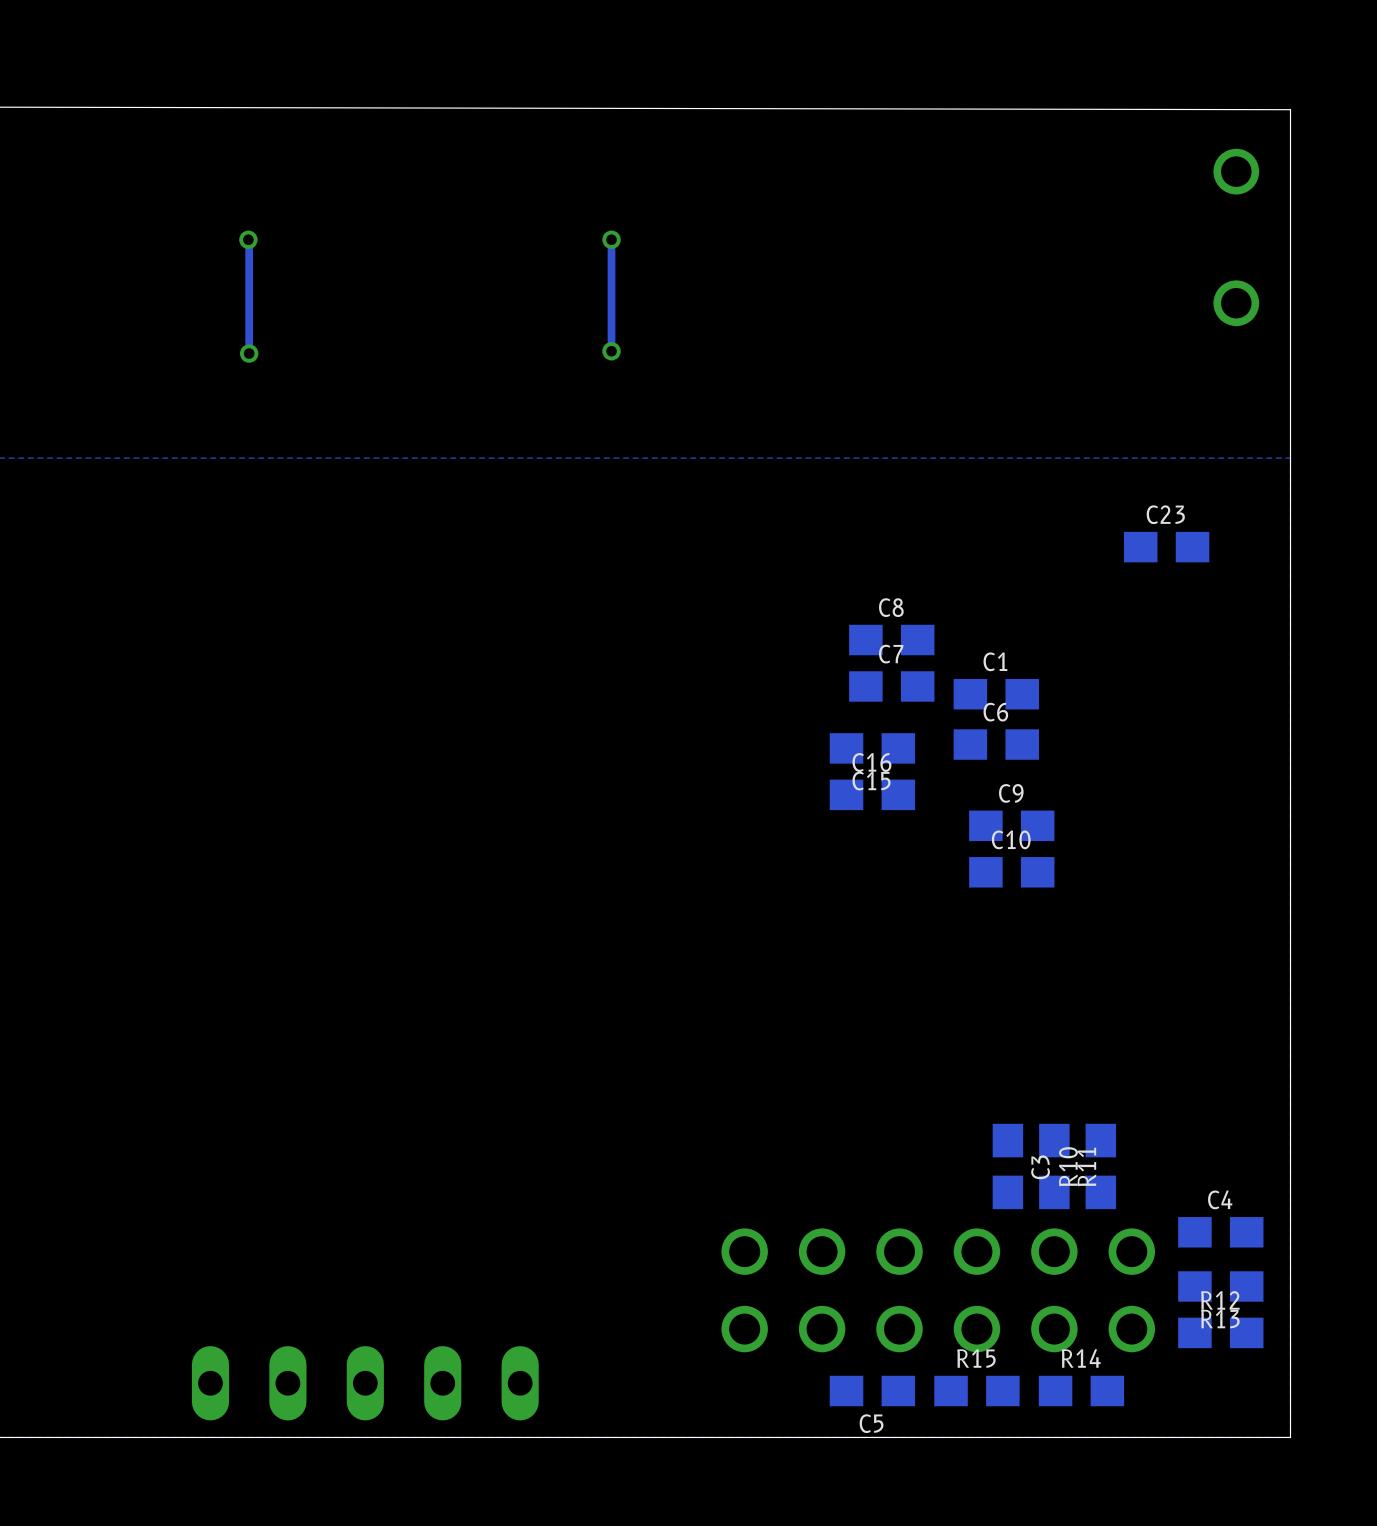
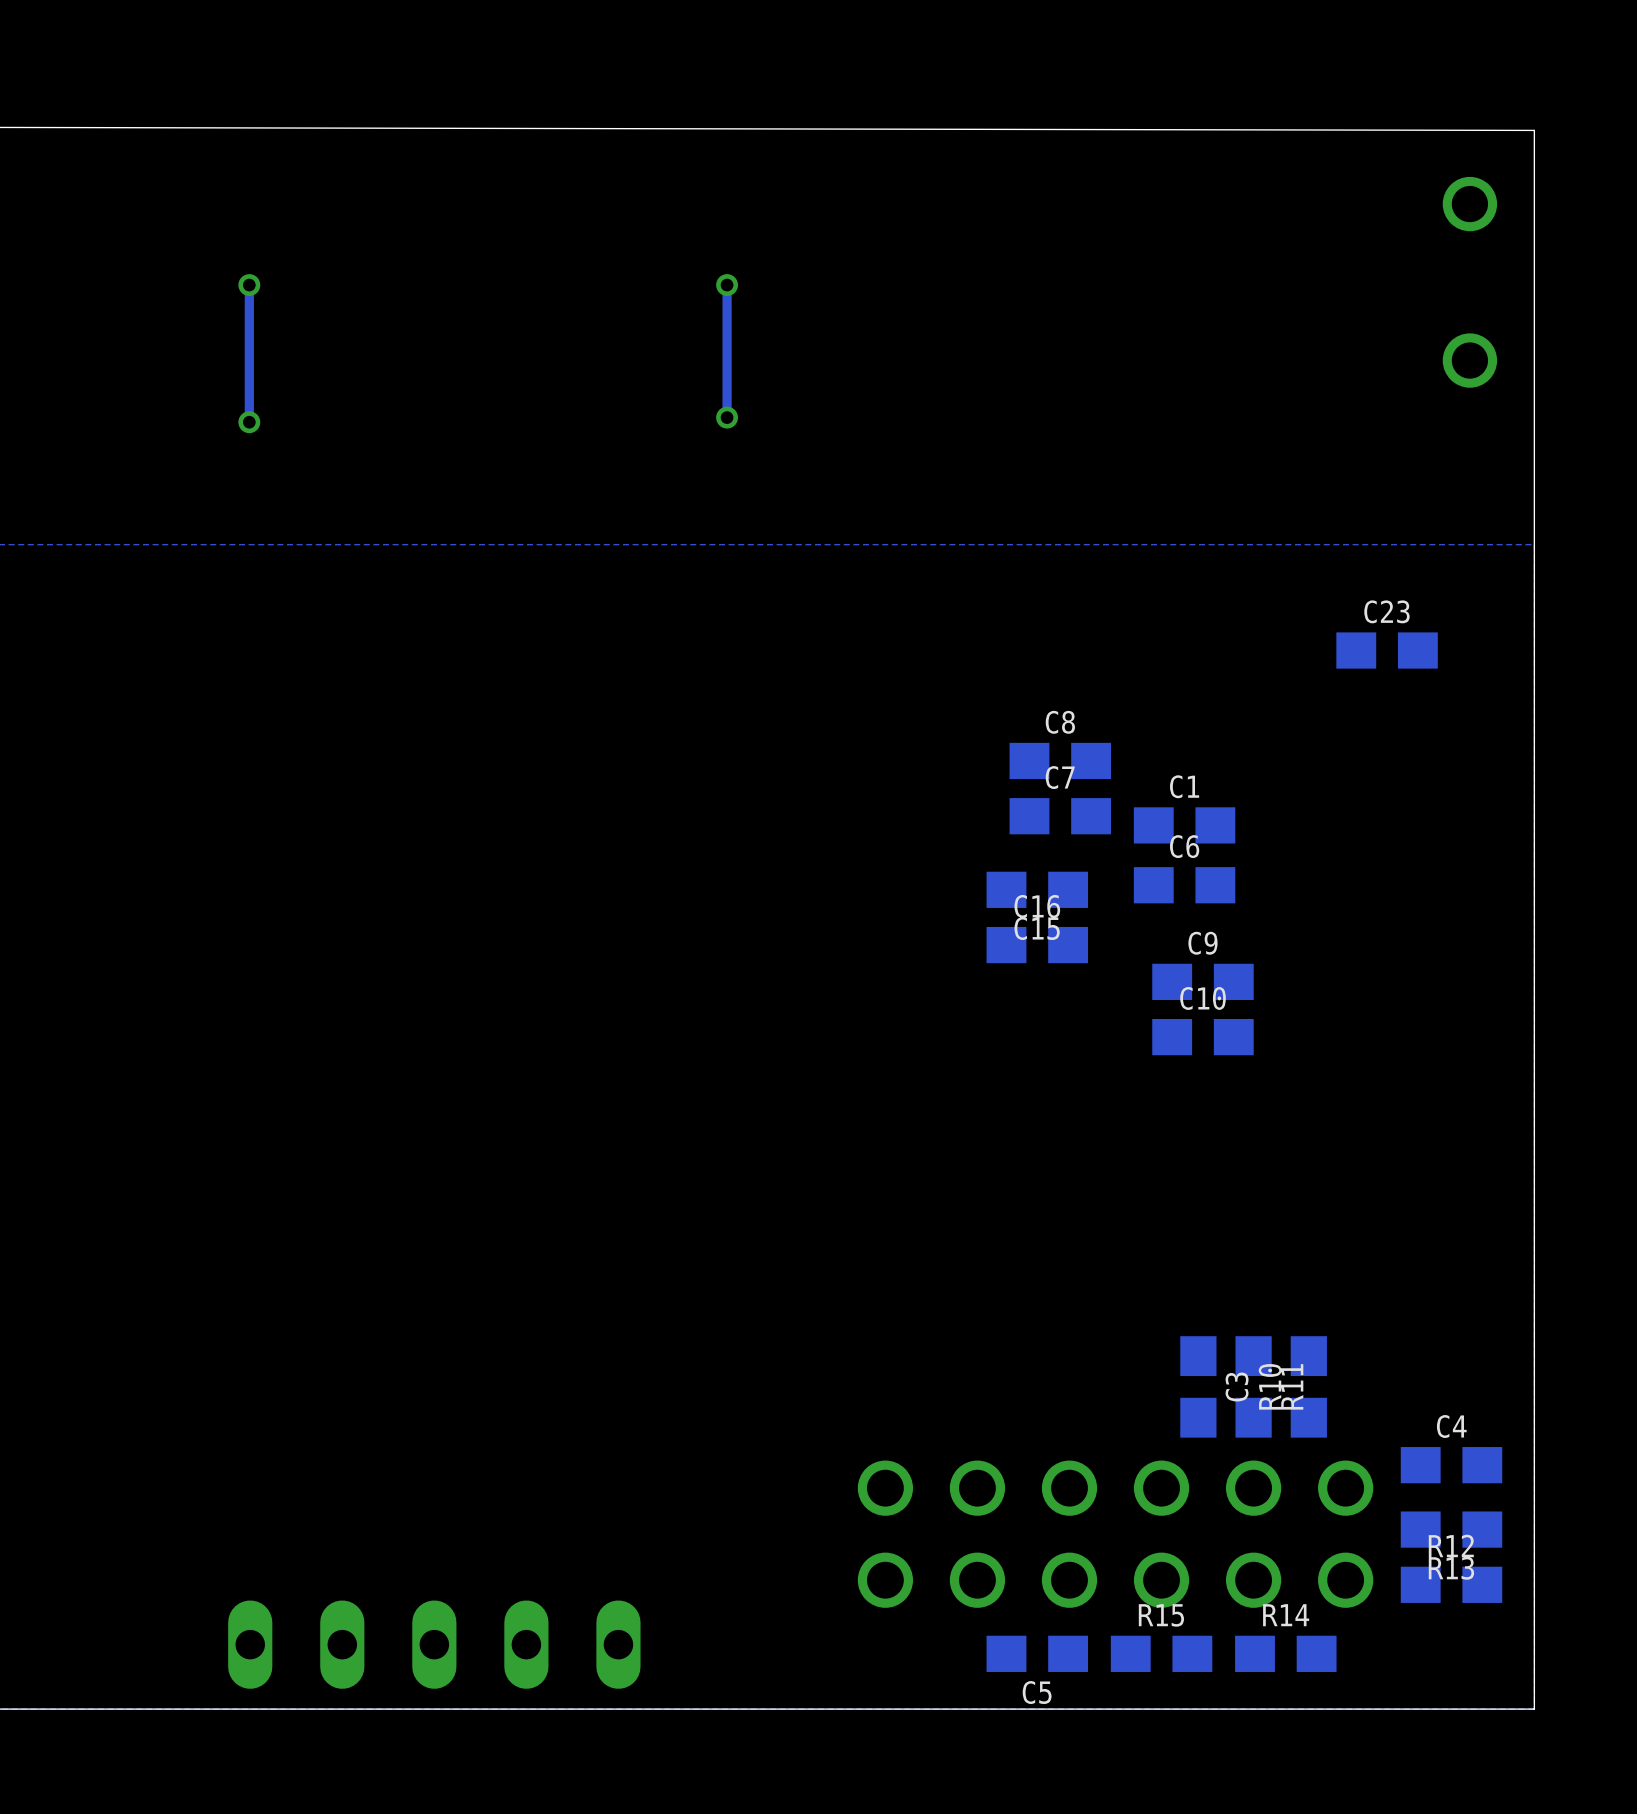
track: none -> (249, 285) (249, 422)
track: (248, 239) (249, 353) -> none
via position: (248, 239) -> (249, 285)
via position: (249, 353) -> (249, 422)

